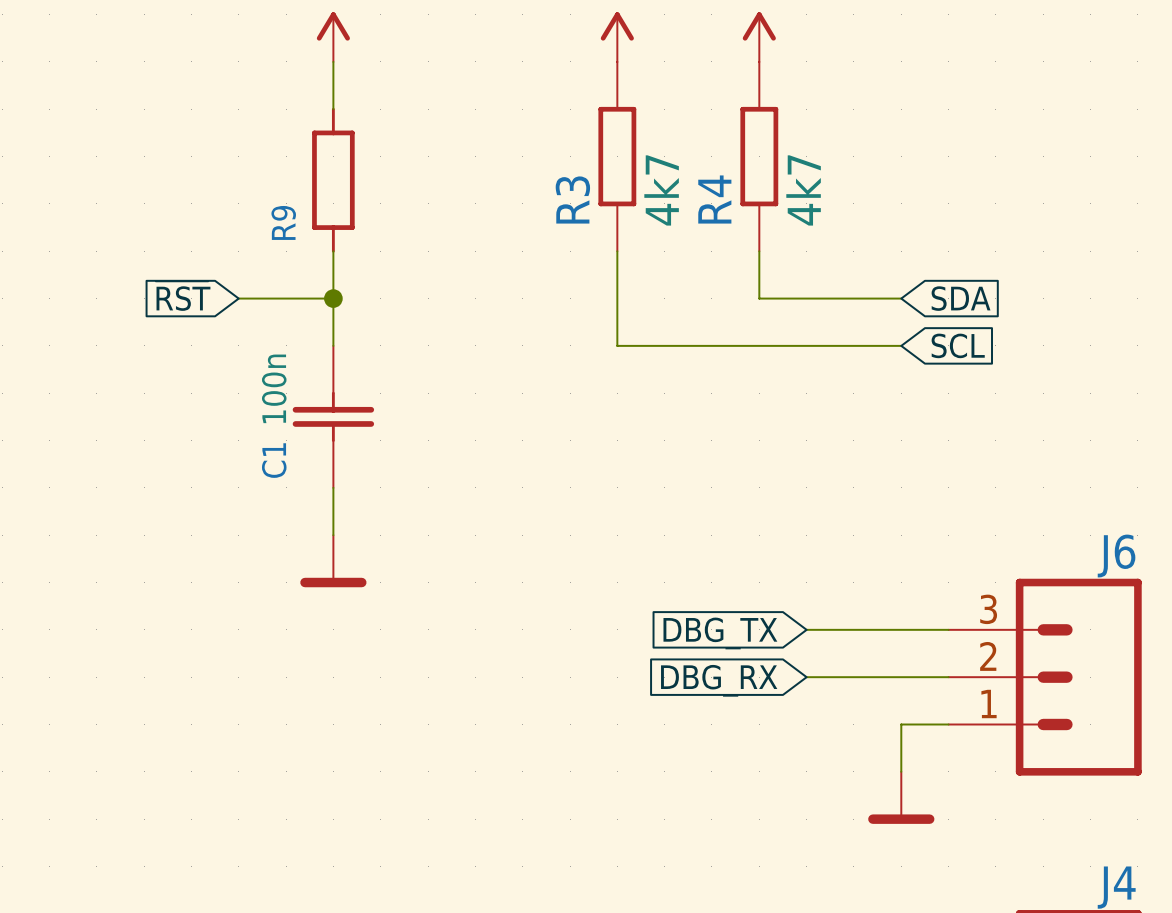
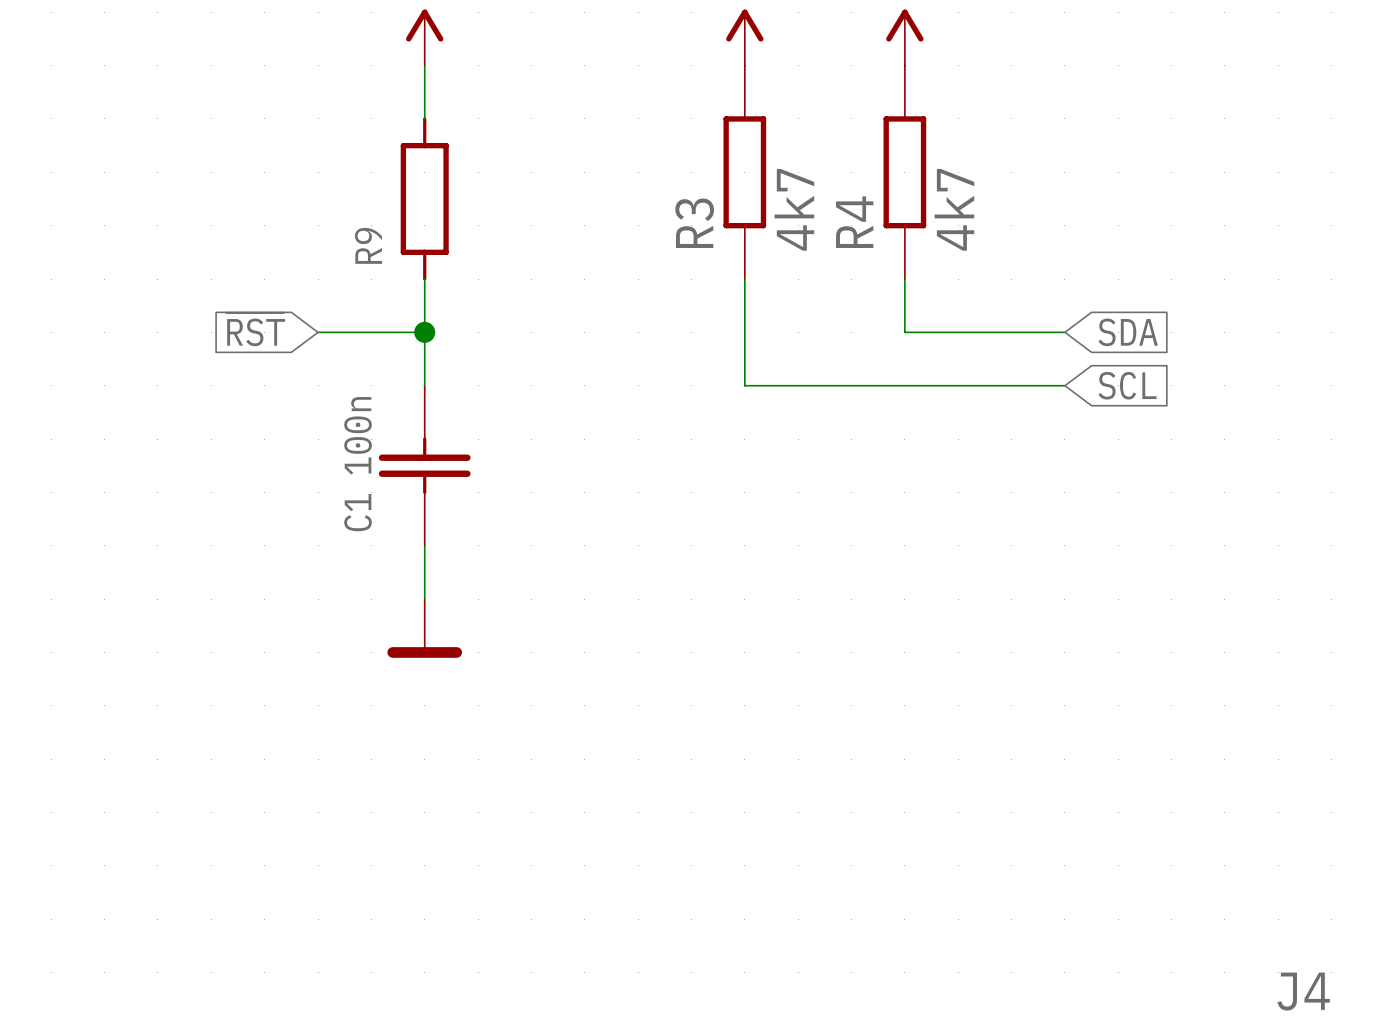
wire: (806, 629) (948, 629) -> none
global label: DBG_TX (720, 633) -> none
wire: (806, 677) (948, 677) -> none
J6: (1045, 677) -> none
global label: DBG_RX (719, 680) -> none
wire: (948, 724) (901, 724) (901, 771) -> none
power symbol: (901, 797) -> none

